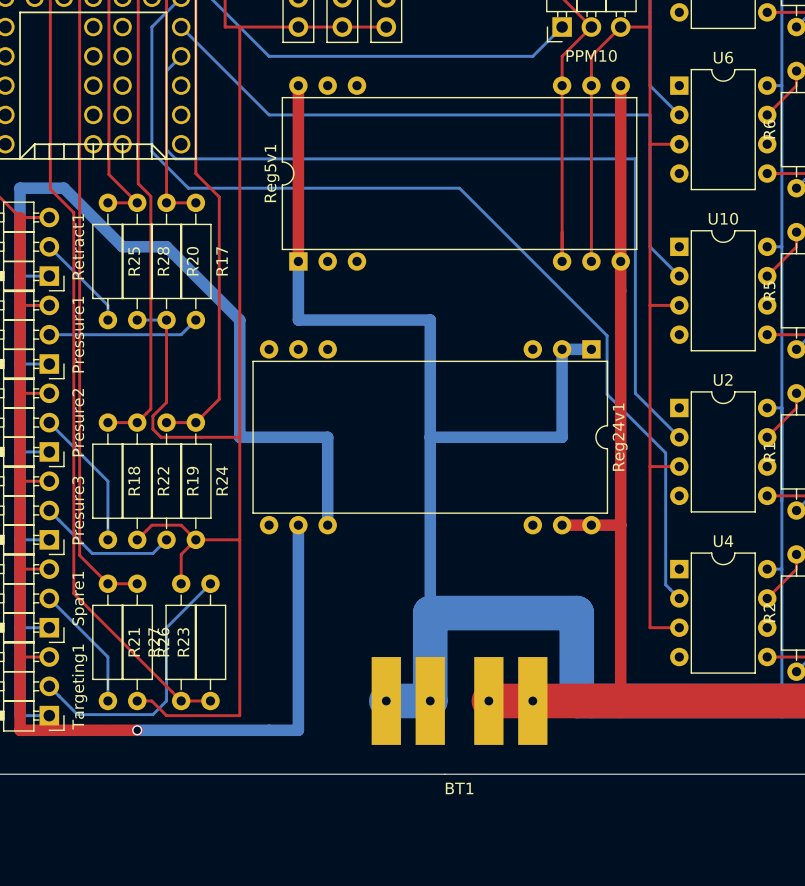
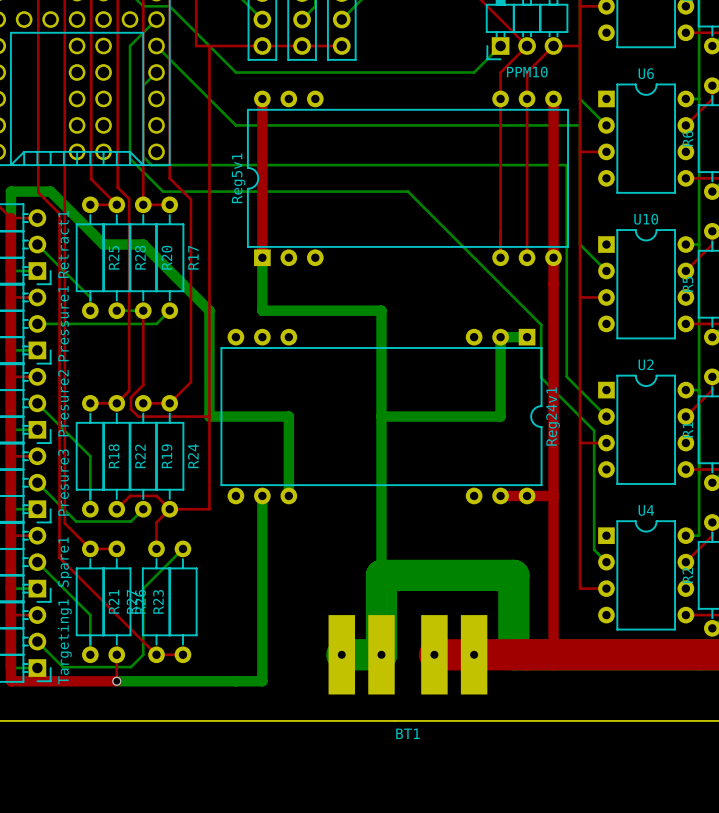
top track: (239, 539) (239, 715) (166, 715) (151, 700) (137, 700) -> (116, 681) (116, 654)
bottom track: (781, 569) (781, 700) -> none

